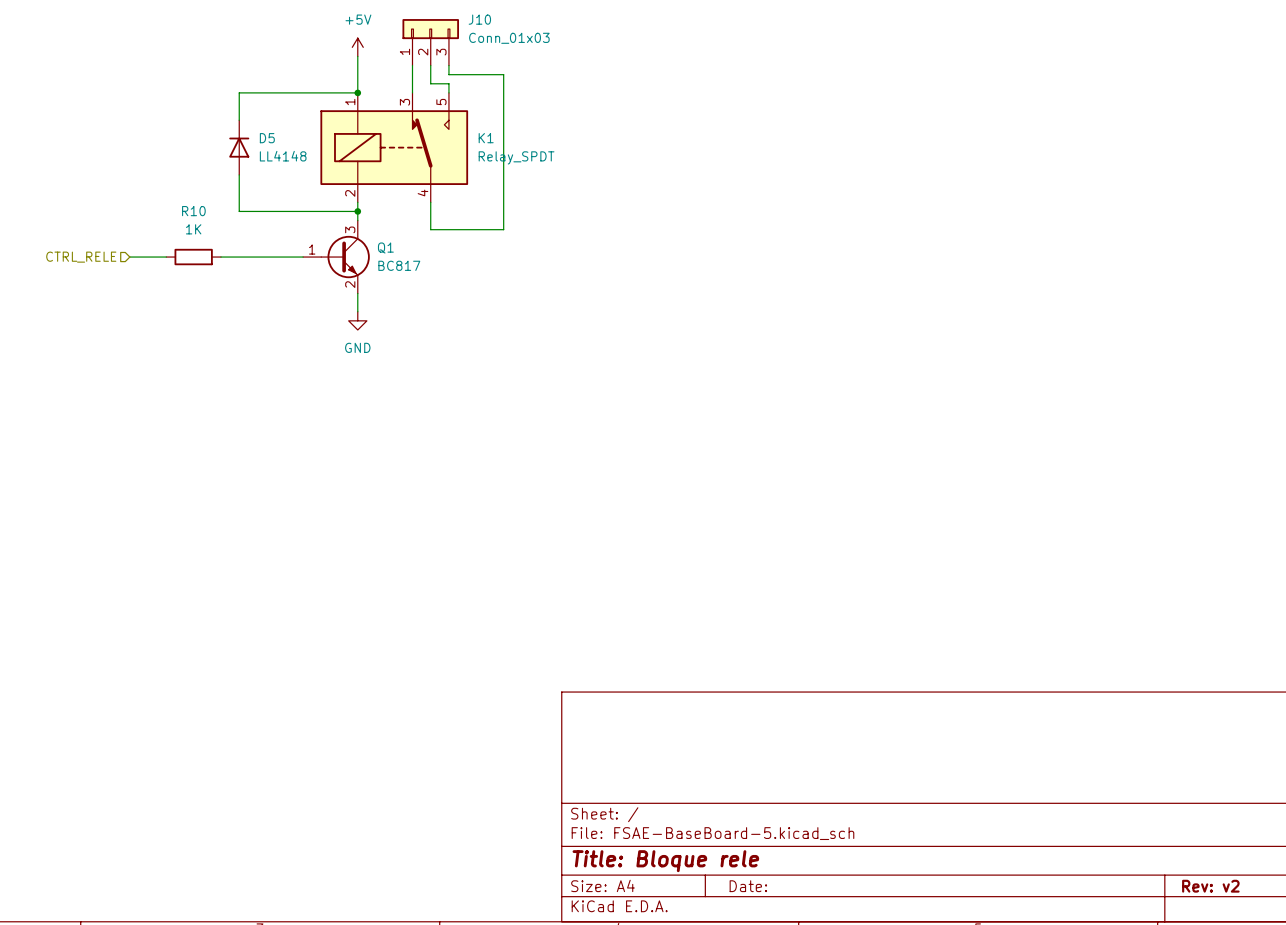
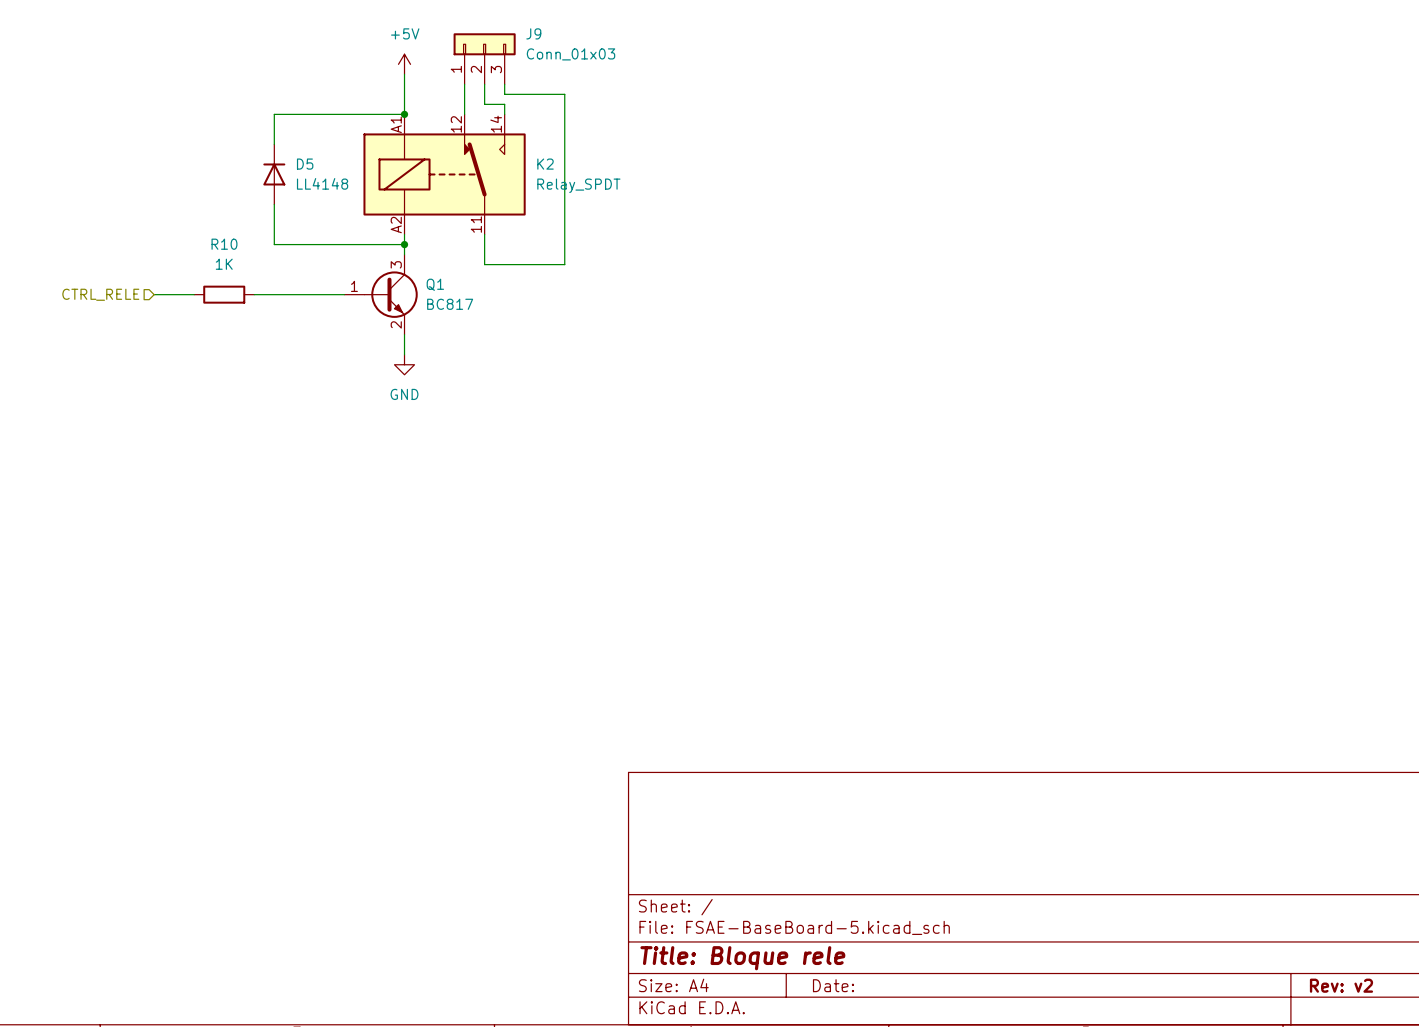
J10 name: J10 (479, 19) -> J9 (533, 33)
K1 pin number: 1 (350, 102) -> A1 (396, 124)
K1 pin number: 3 (404, 102) -> 12 (456, 124)
K1 pin number: 5 (441, 102) -> 14 (496, 124)
K1 name: K1 (486, 138) -> K2 (545, 164)
K1 pin number: 4 (422, 192) -> 11 (476, 224)
K1 pin number: 2 (350, 193) -> A2 (396, 225)

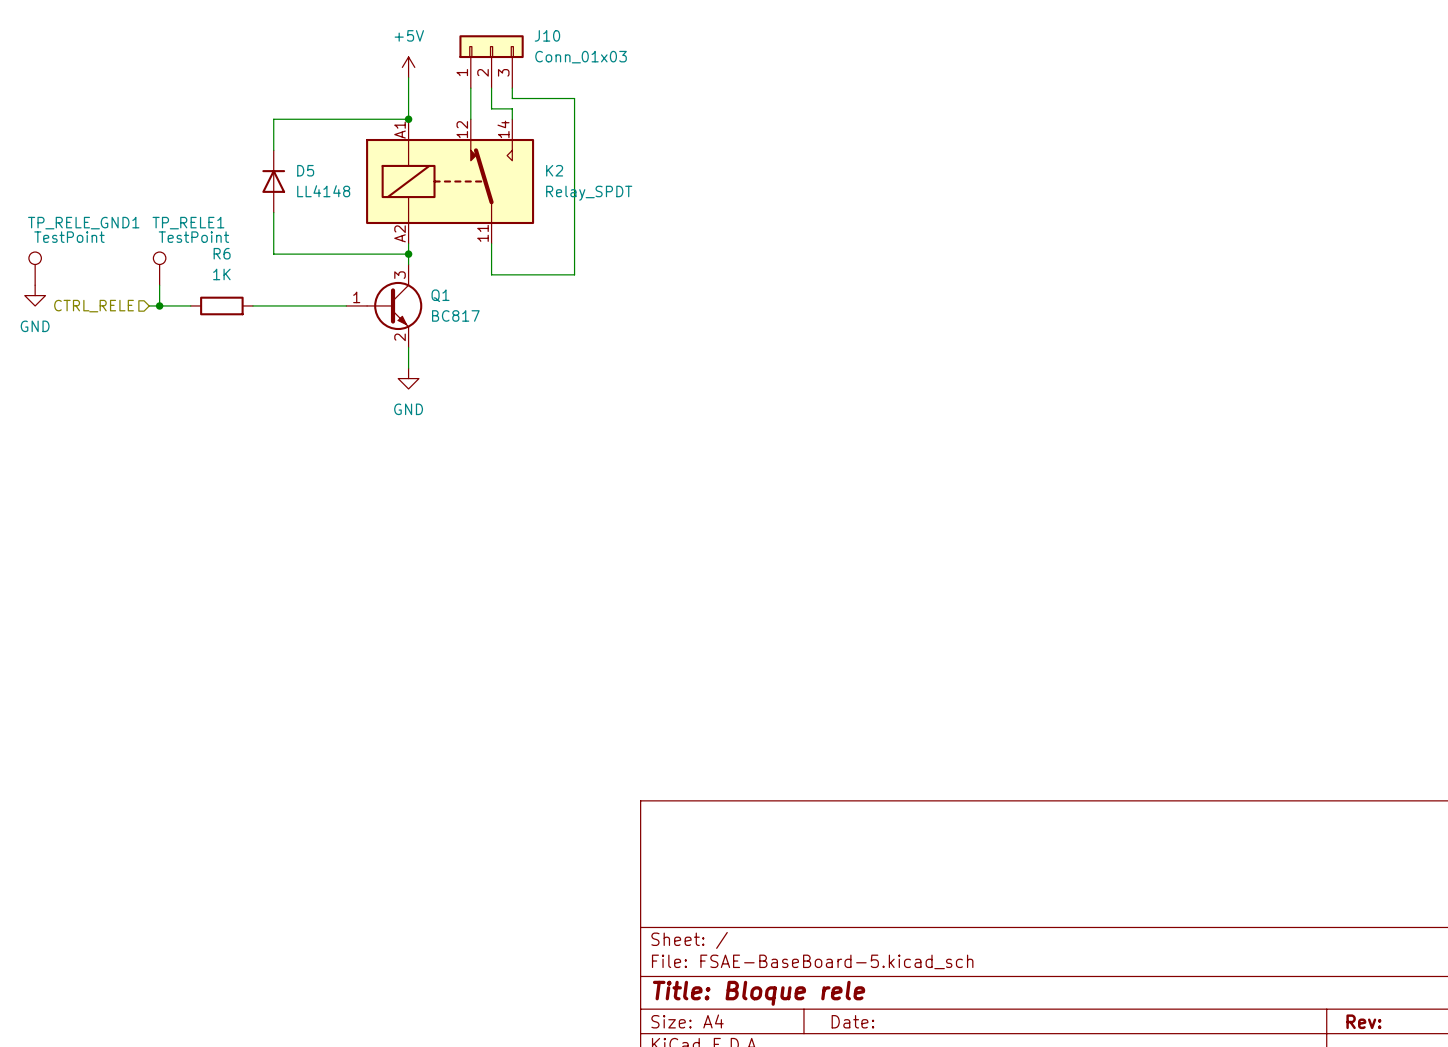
J9 name: J9 (533, 33) -> J10 (547, 35)
R10 name: R10 (224, 244) -> R6 (222, 253)
TP_RELE_GND1: none -> TestPoint (35, 268)
TP_RELE1: none -> TestPoint (159, 268)
wire: none -> (159, 285) (159, 305)
power symbol: none -> GND (35, 295)
junction: none -> (159, 305)
title block: Rev: v2 (1341, 985) -> Rev: (1363, 1021)

